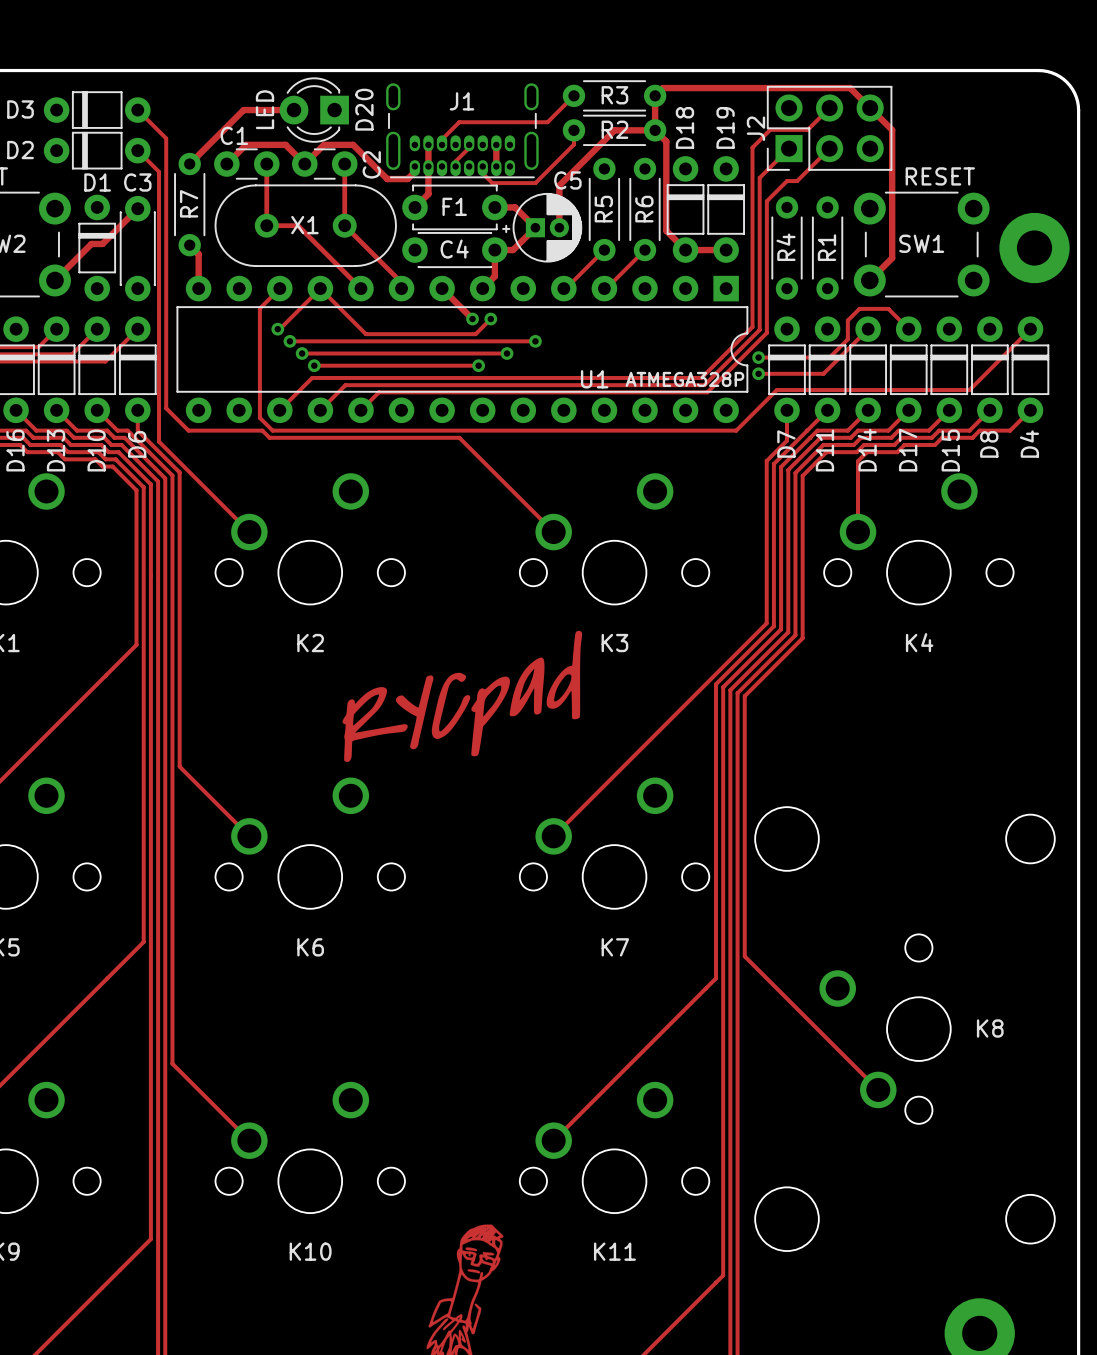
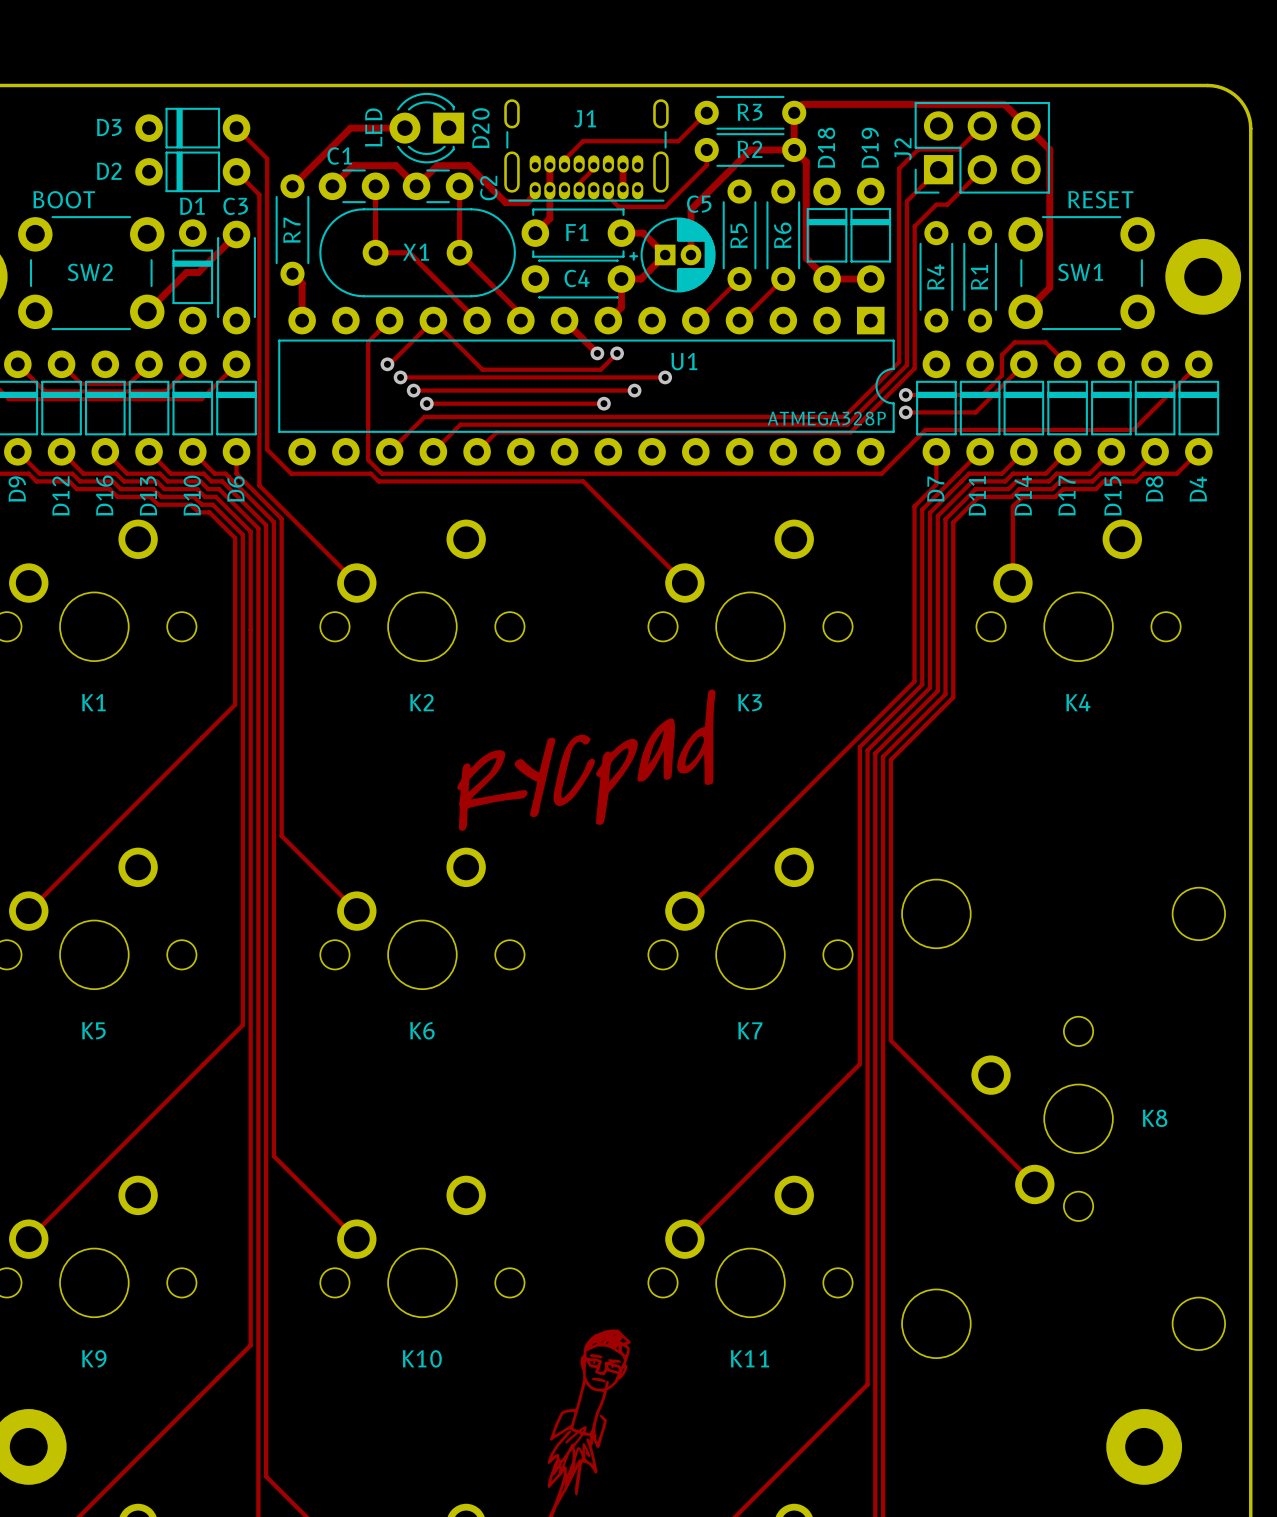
U1 name position: U1 (594, 379) -> U1 (684, 361)

